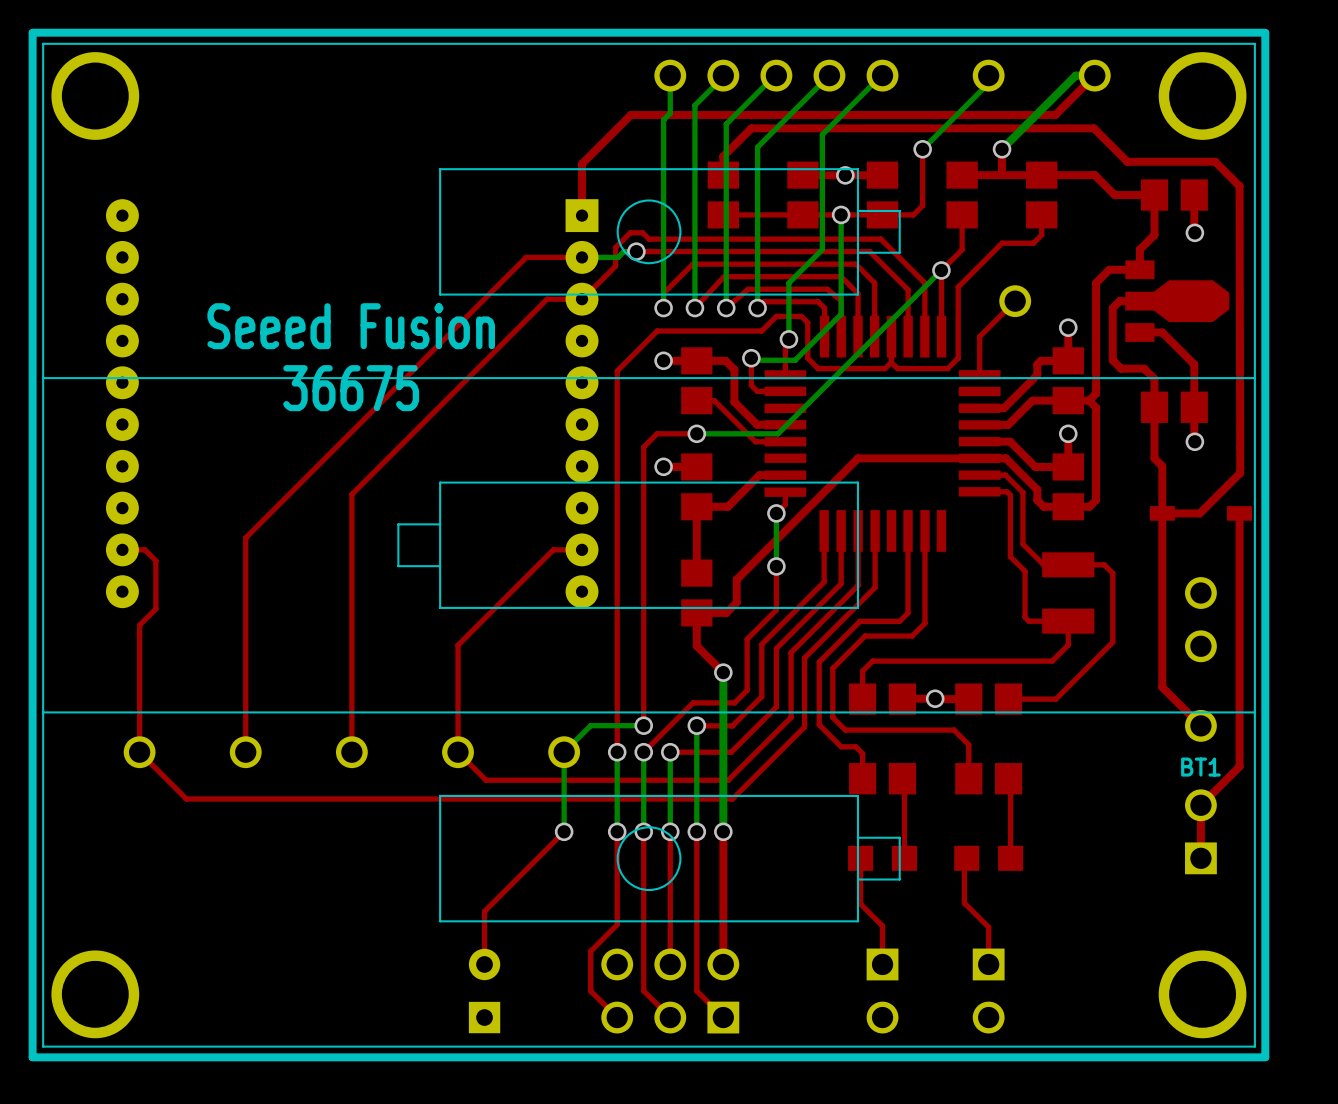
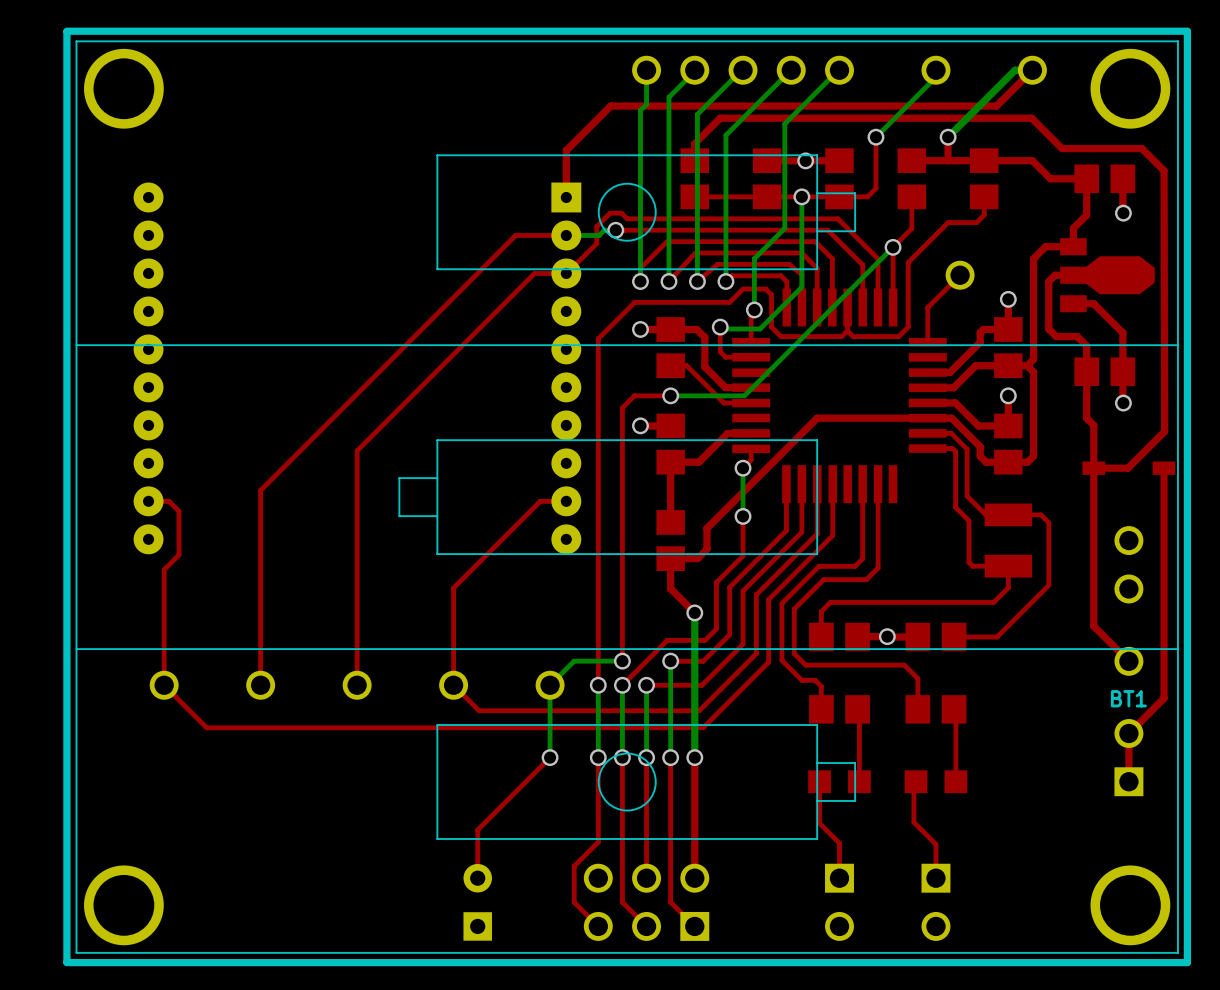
text: Seeed Fusion (351, 326) -> none
text: 36675 (351, 388) -> none

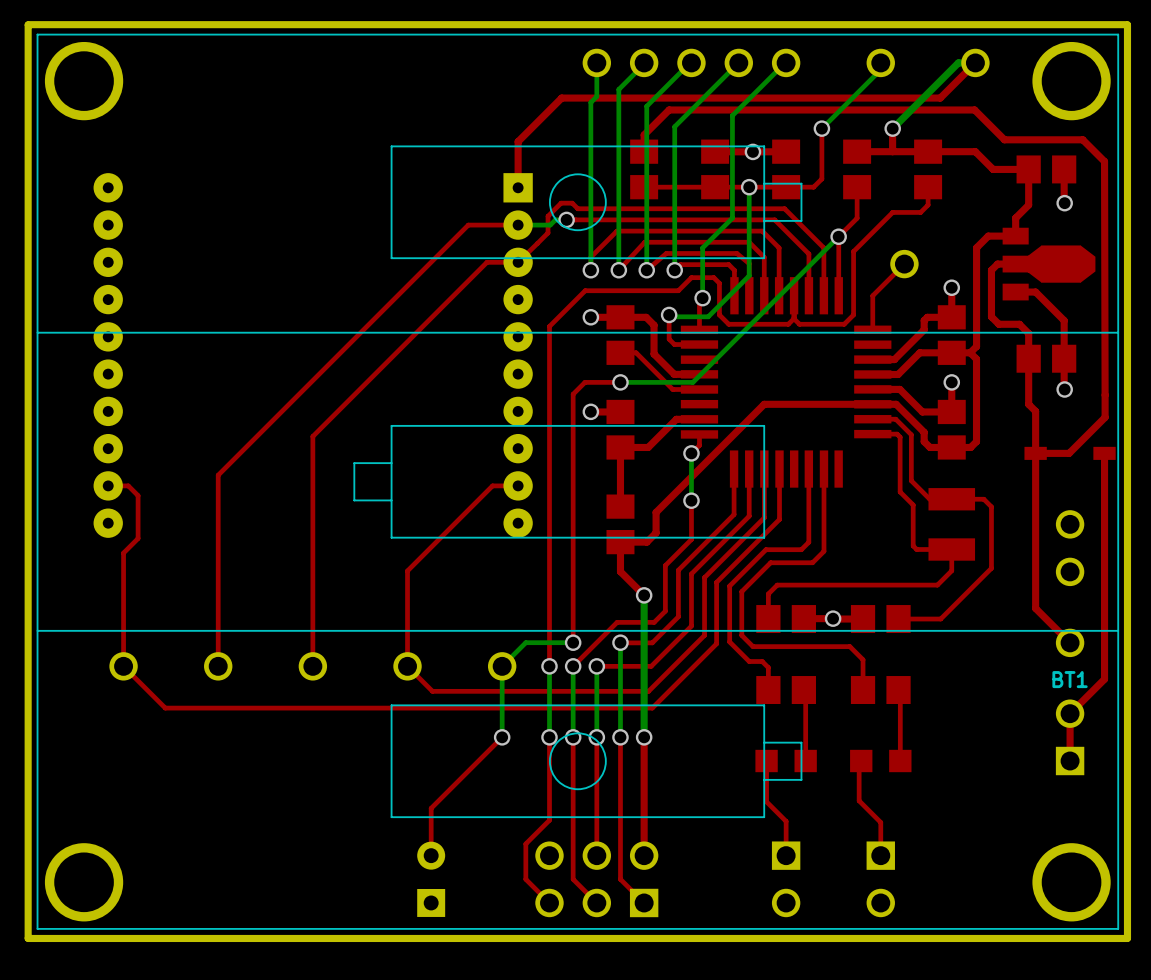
line: (66, 31) (66, 962) -> none
board edge: none -> (28, 25) (28, 938)
line: (1187, 31) (66, 31) -> none
line: (1187, 31) (1187, 962) -> none
board edge: none -> (1127, 24) (28, 24)
board edge: none -> (1127, 25) (1127, 938)
line: (1187, 962) (66, 962) -> none
board edge: none -> (1127, 938) (28, 938)

